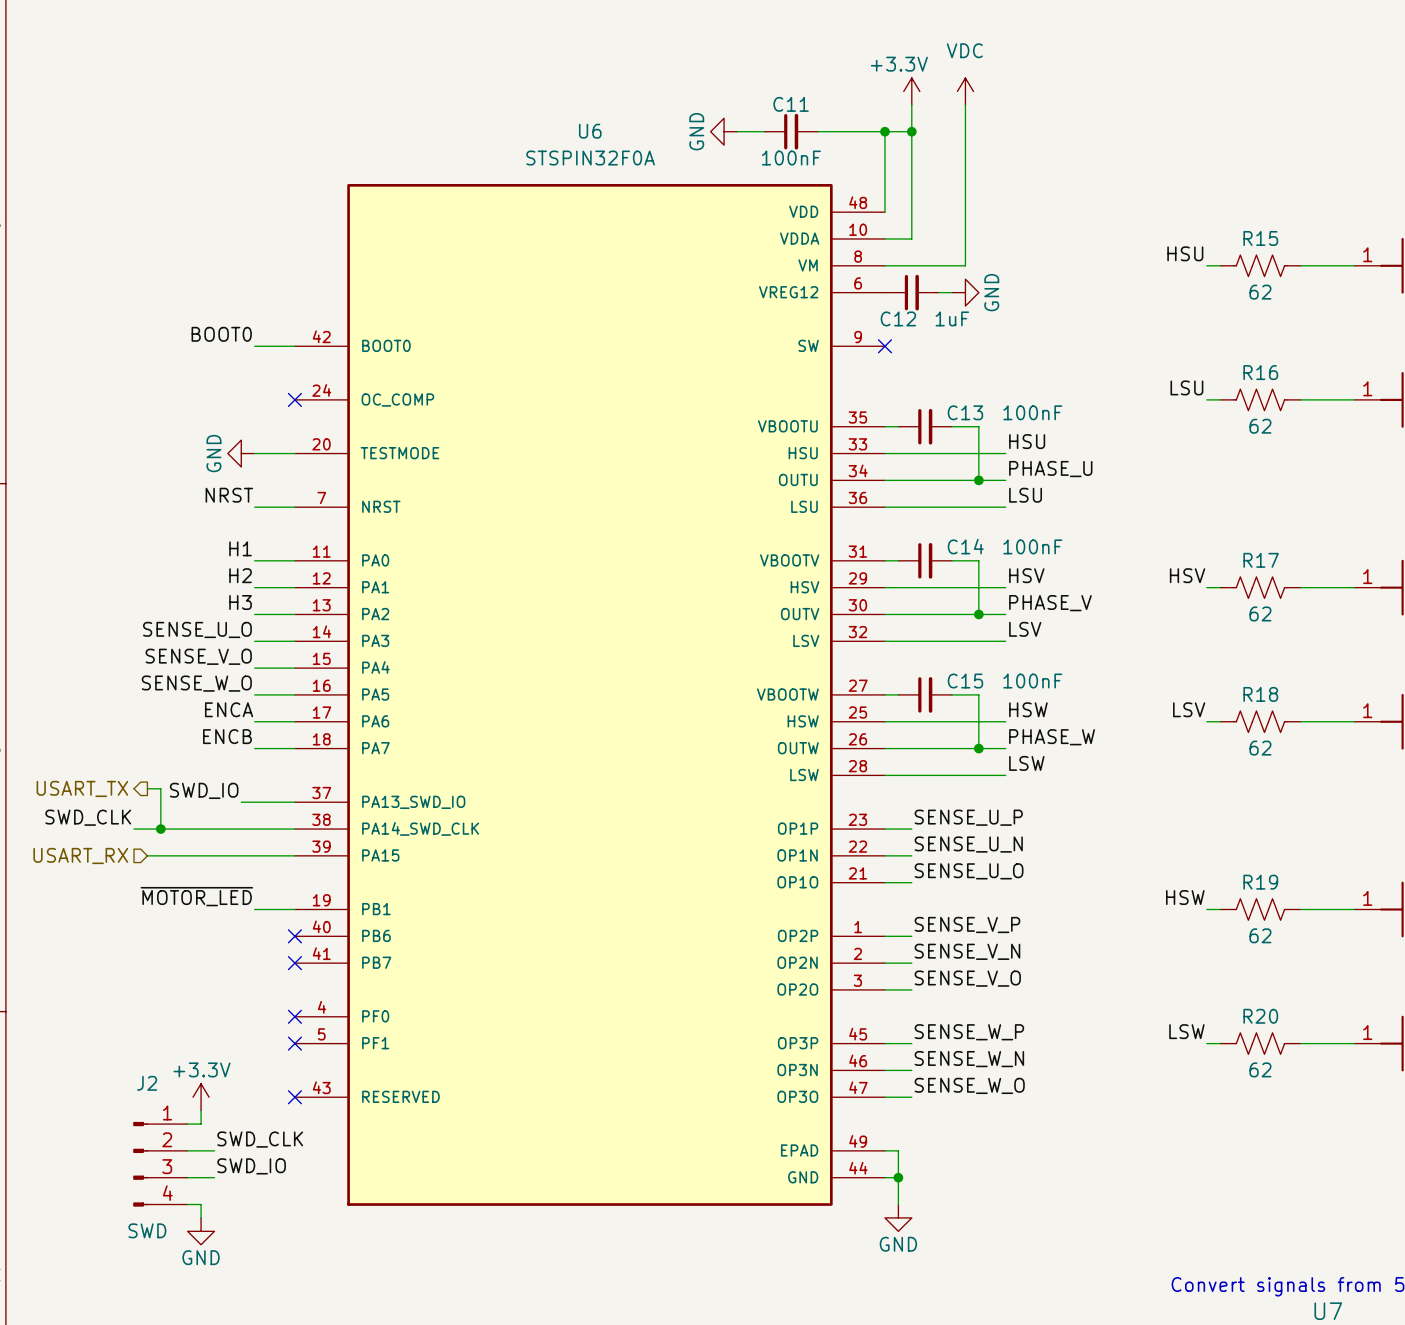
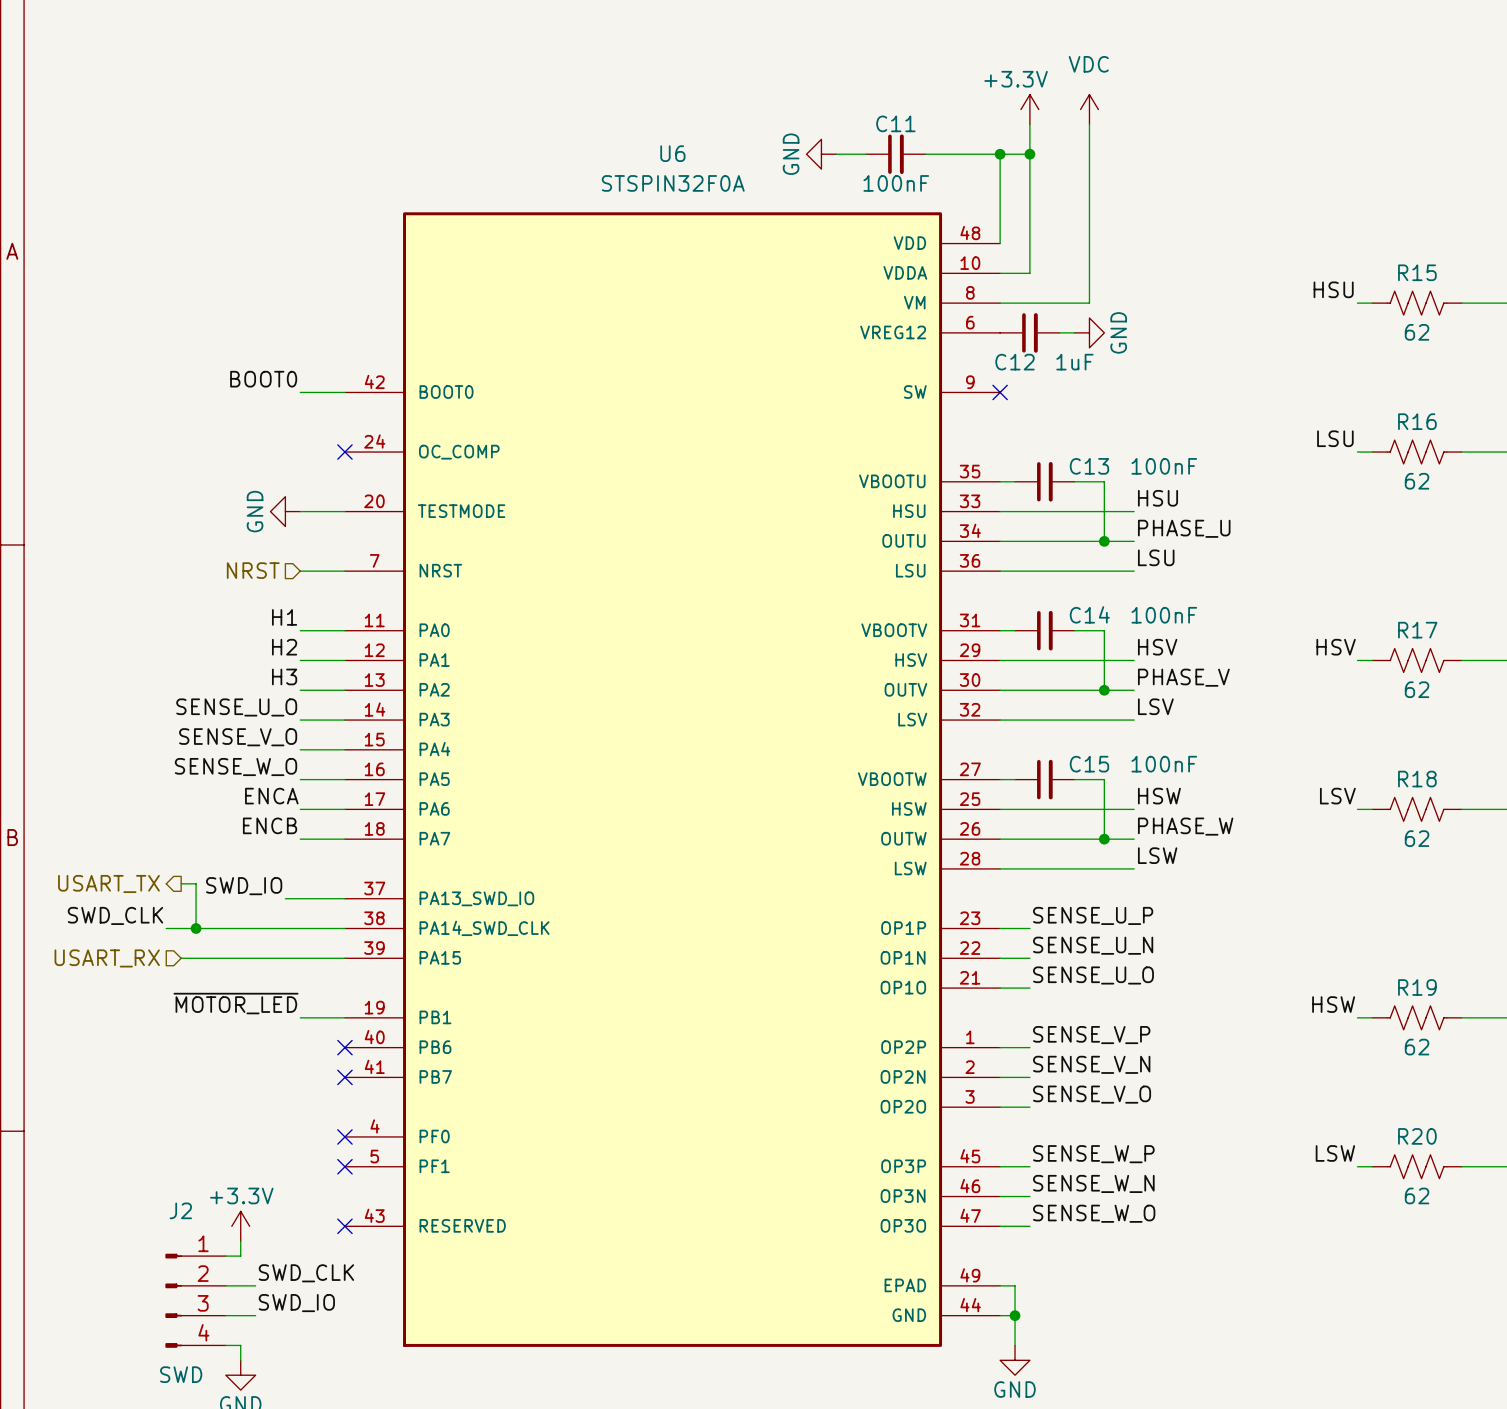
label: NRST (229, 495) -> none
hierarchical label: none -> NRST (253, 570)

